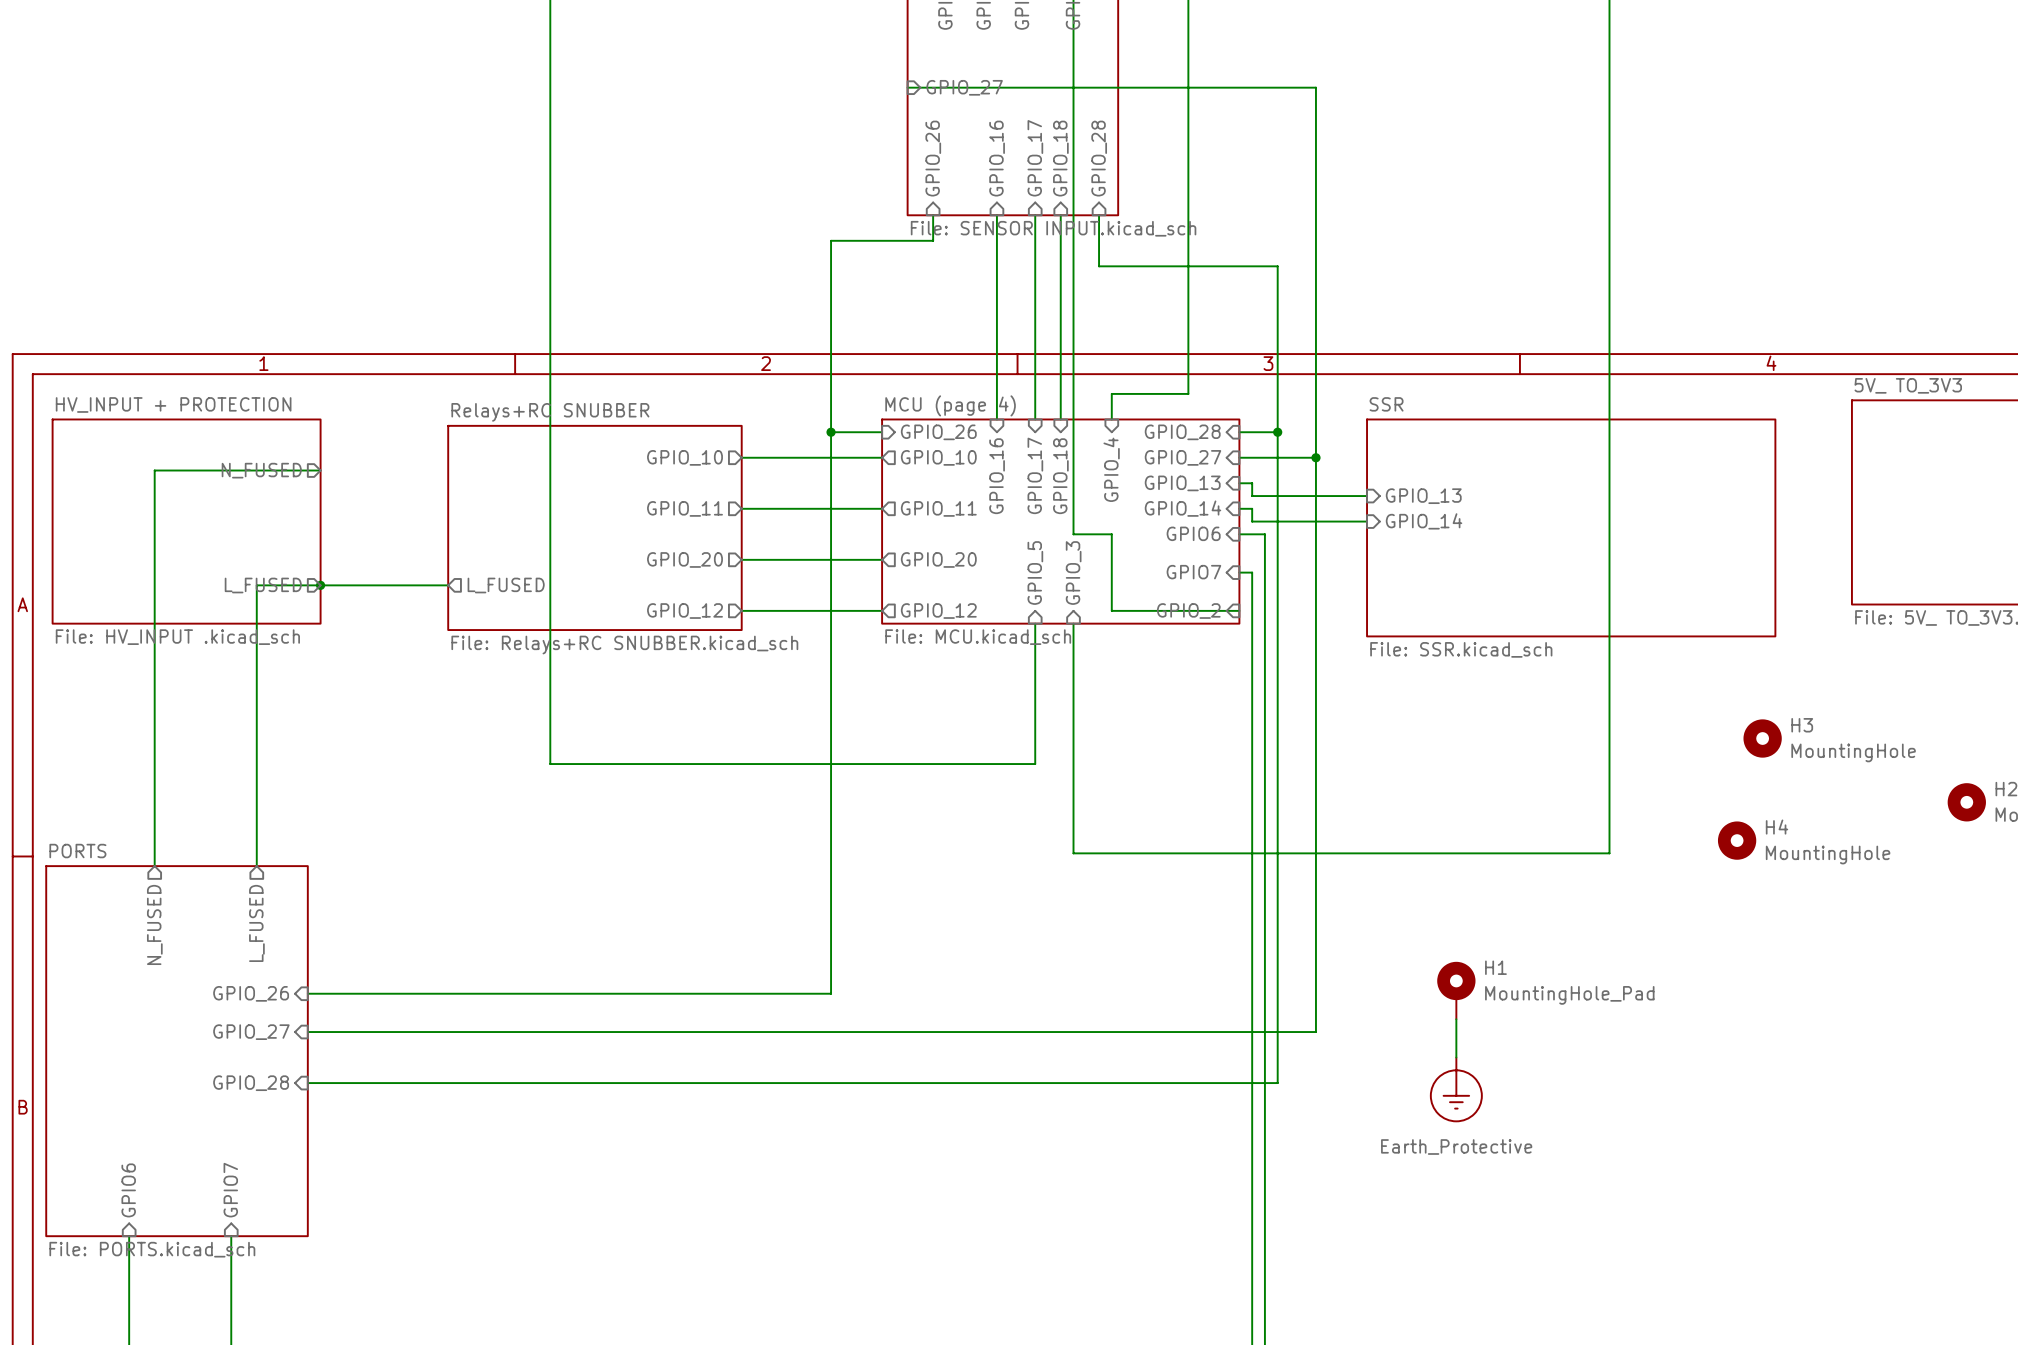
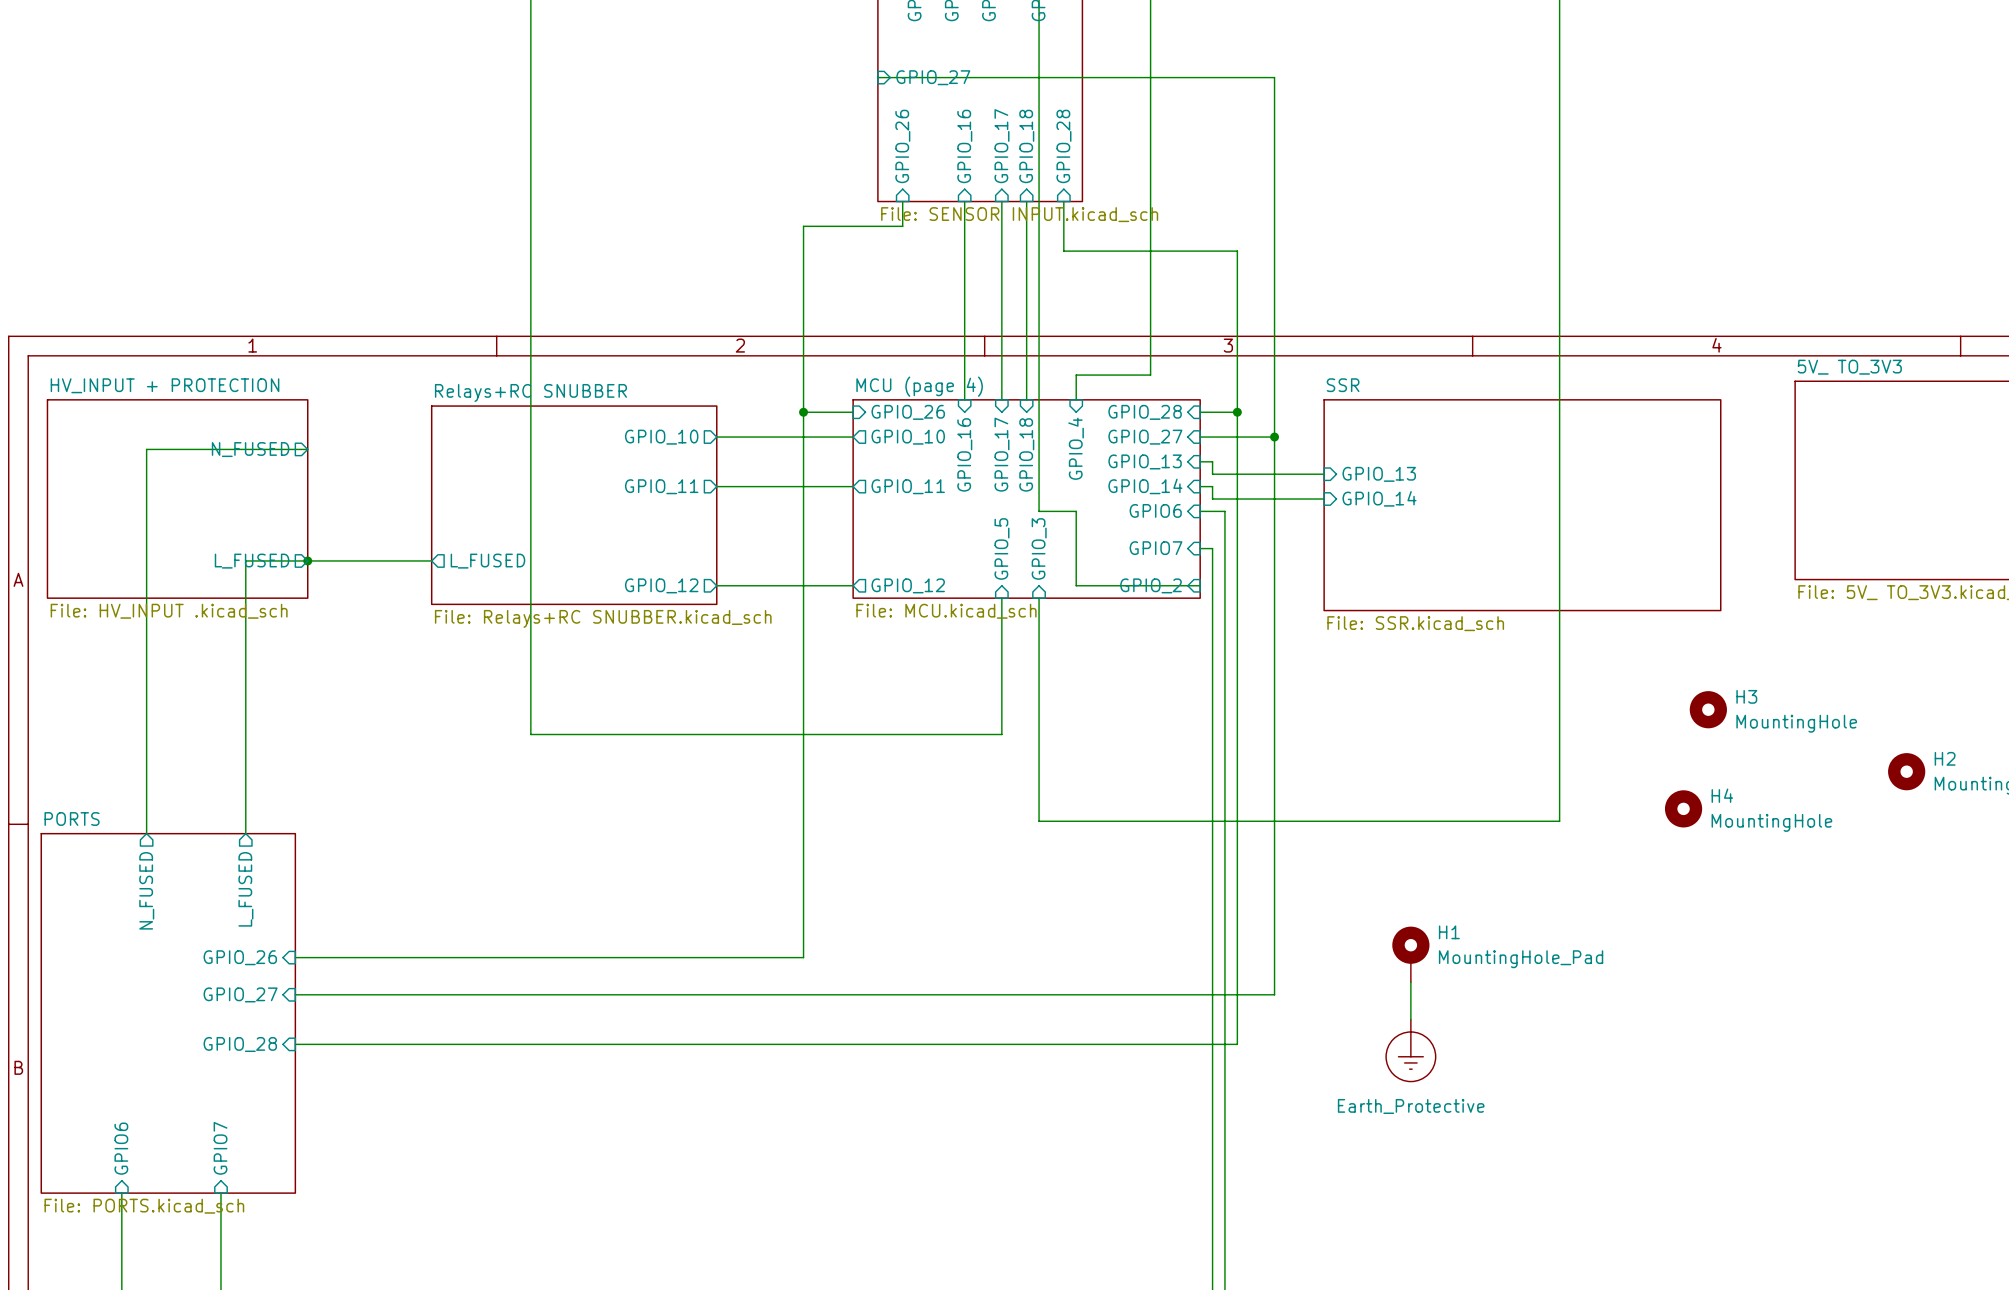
sheet pin: GPIO_20 (685, 559) -> none
wire: (741, 559) (882, 559) -> none
sheet pin: GPIO_20 (938, 559) -> none

